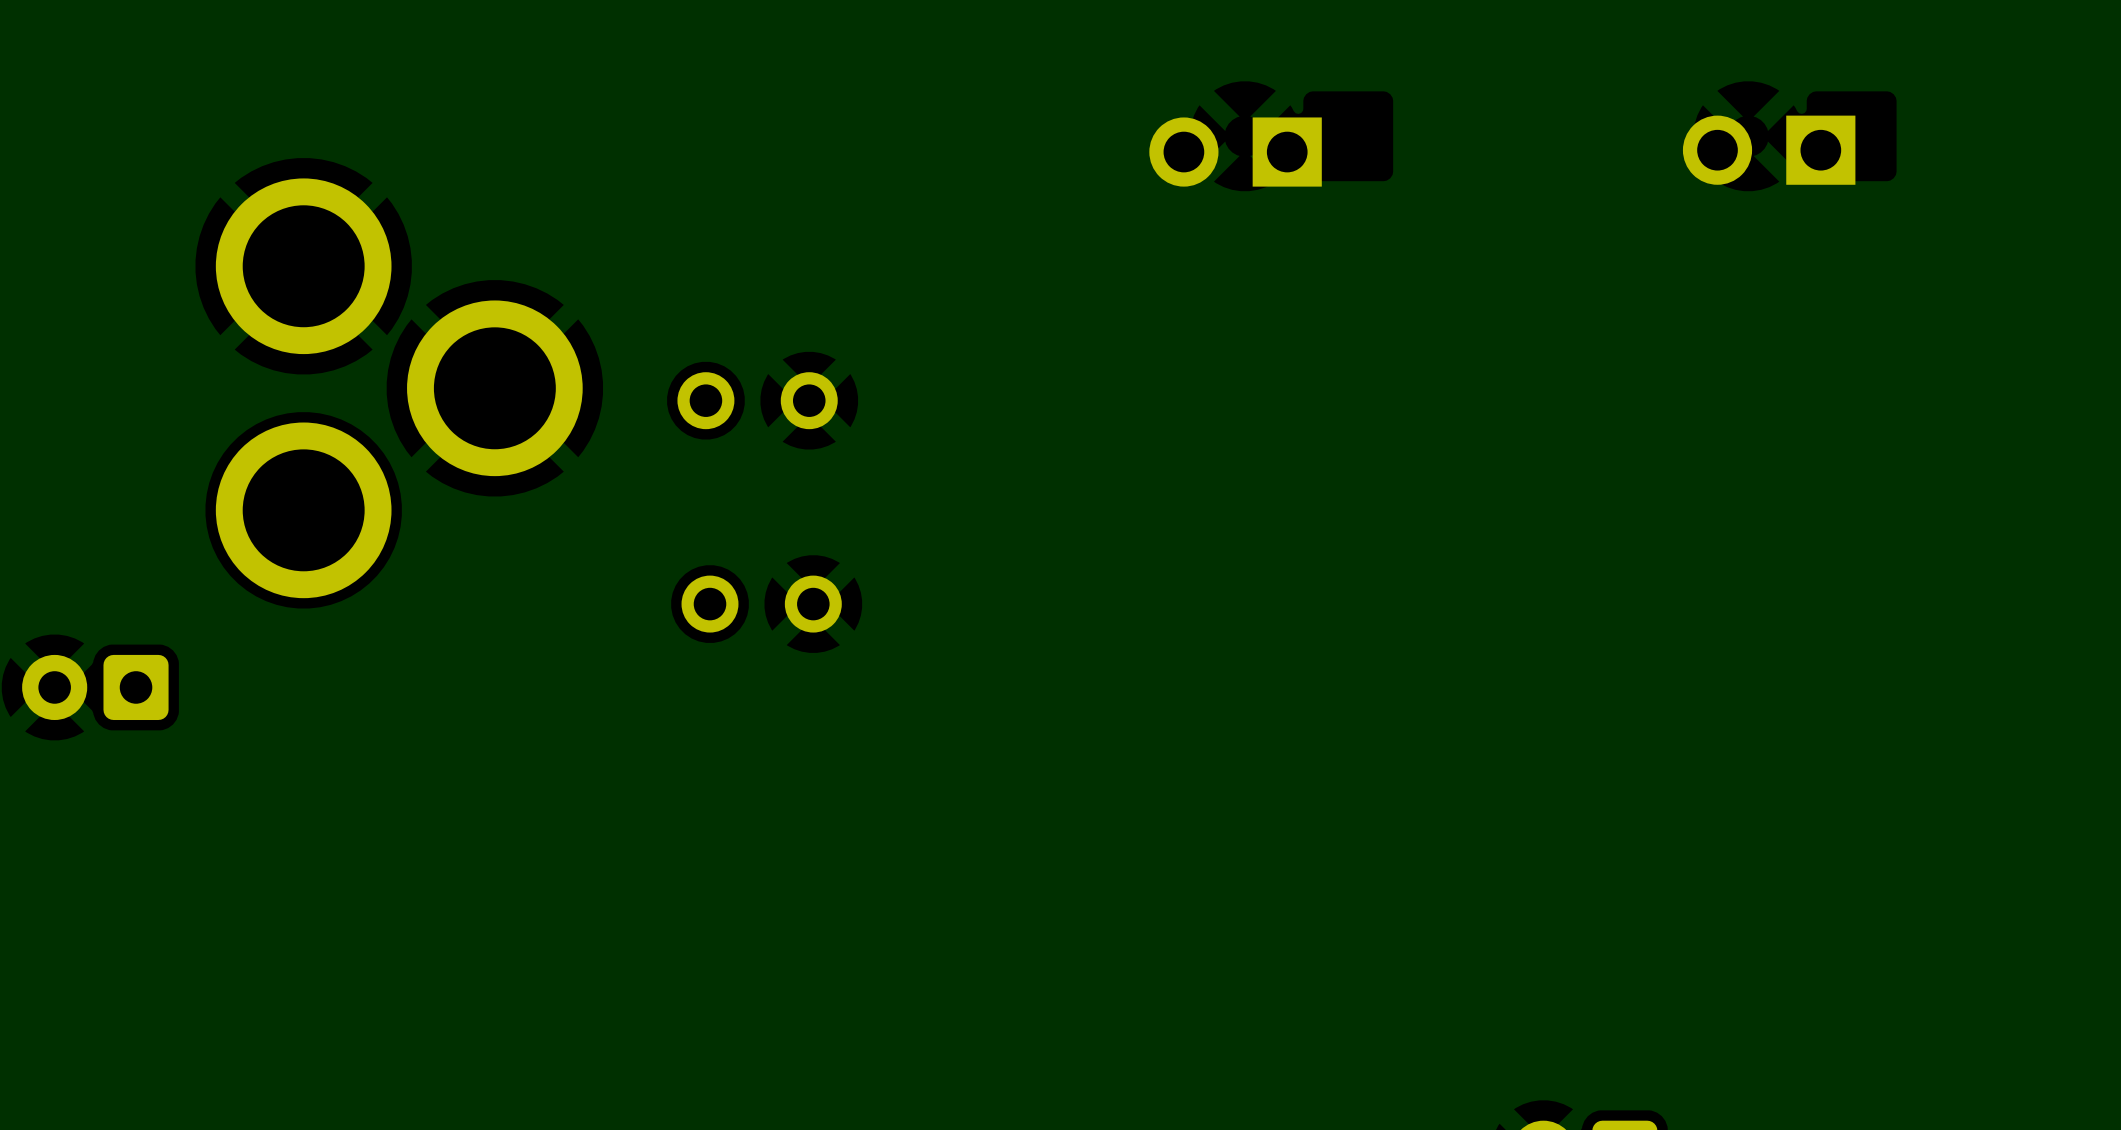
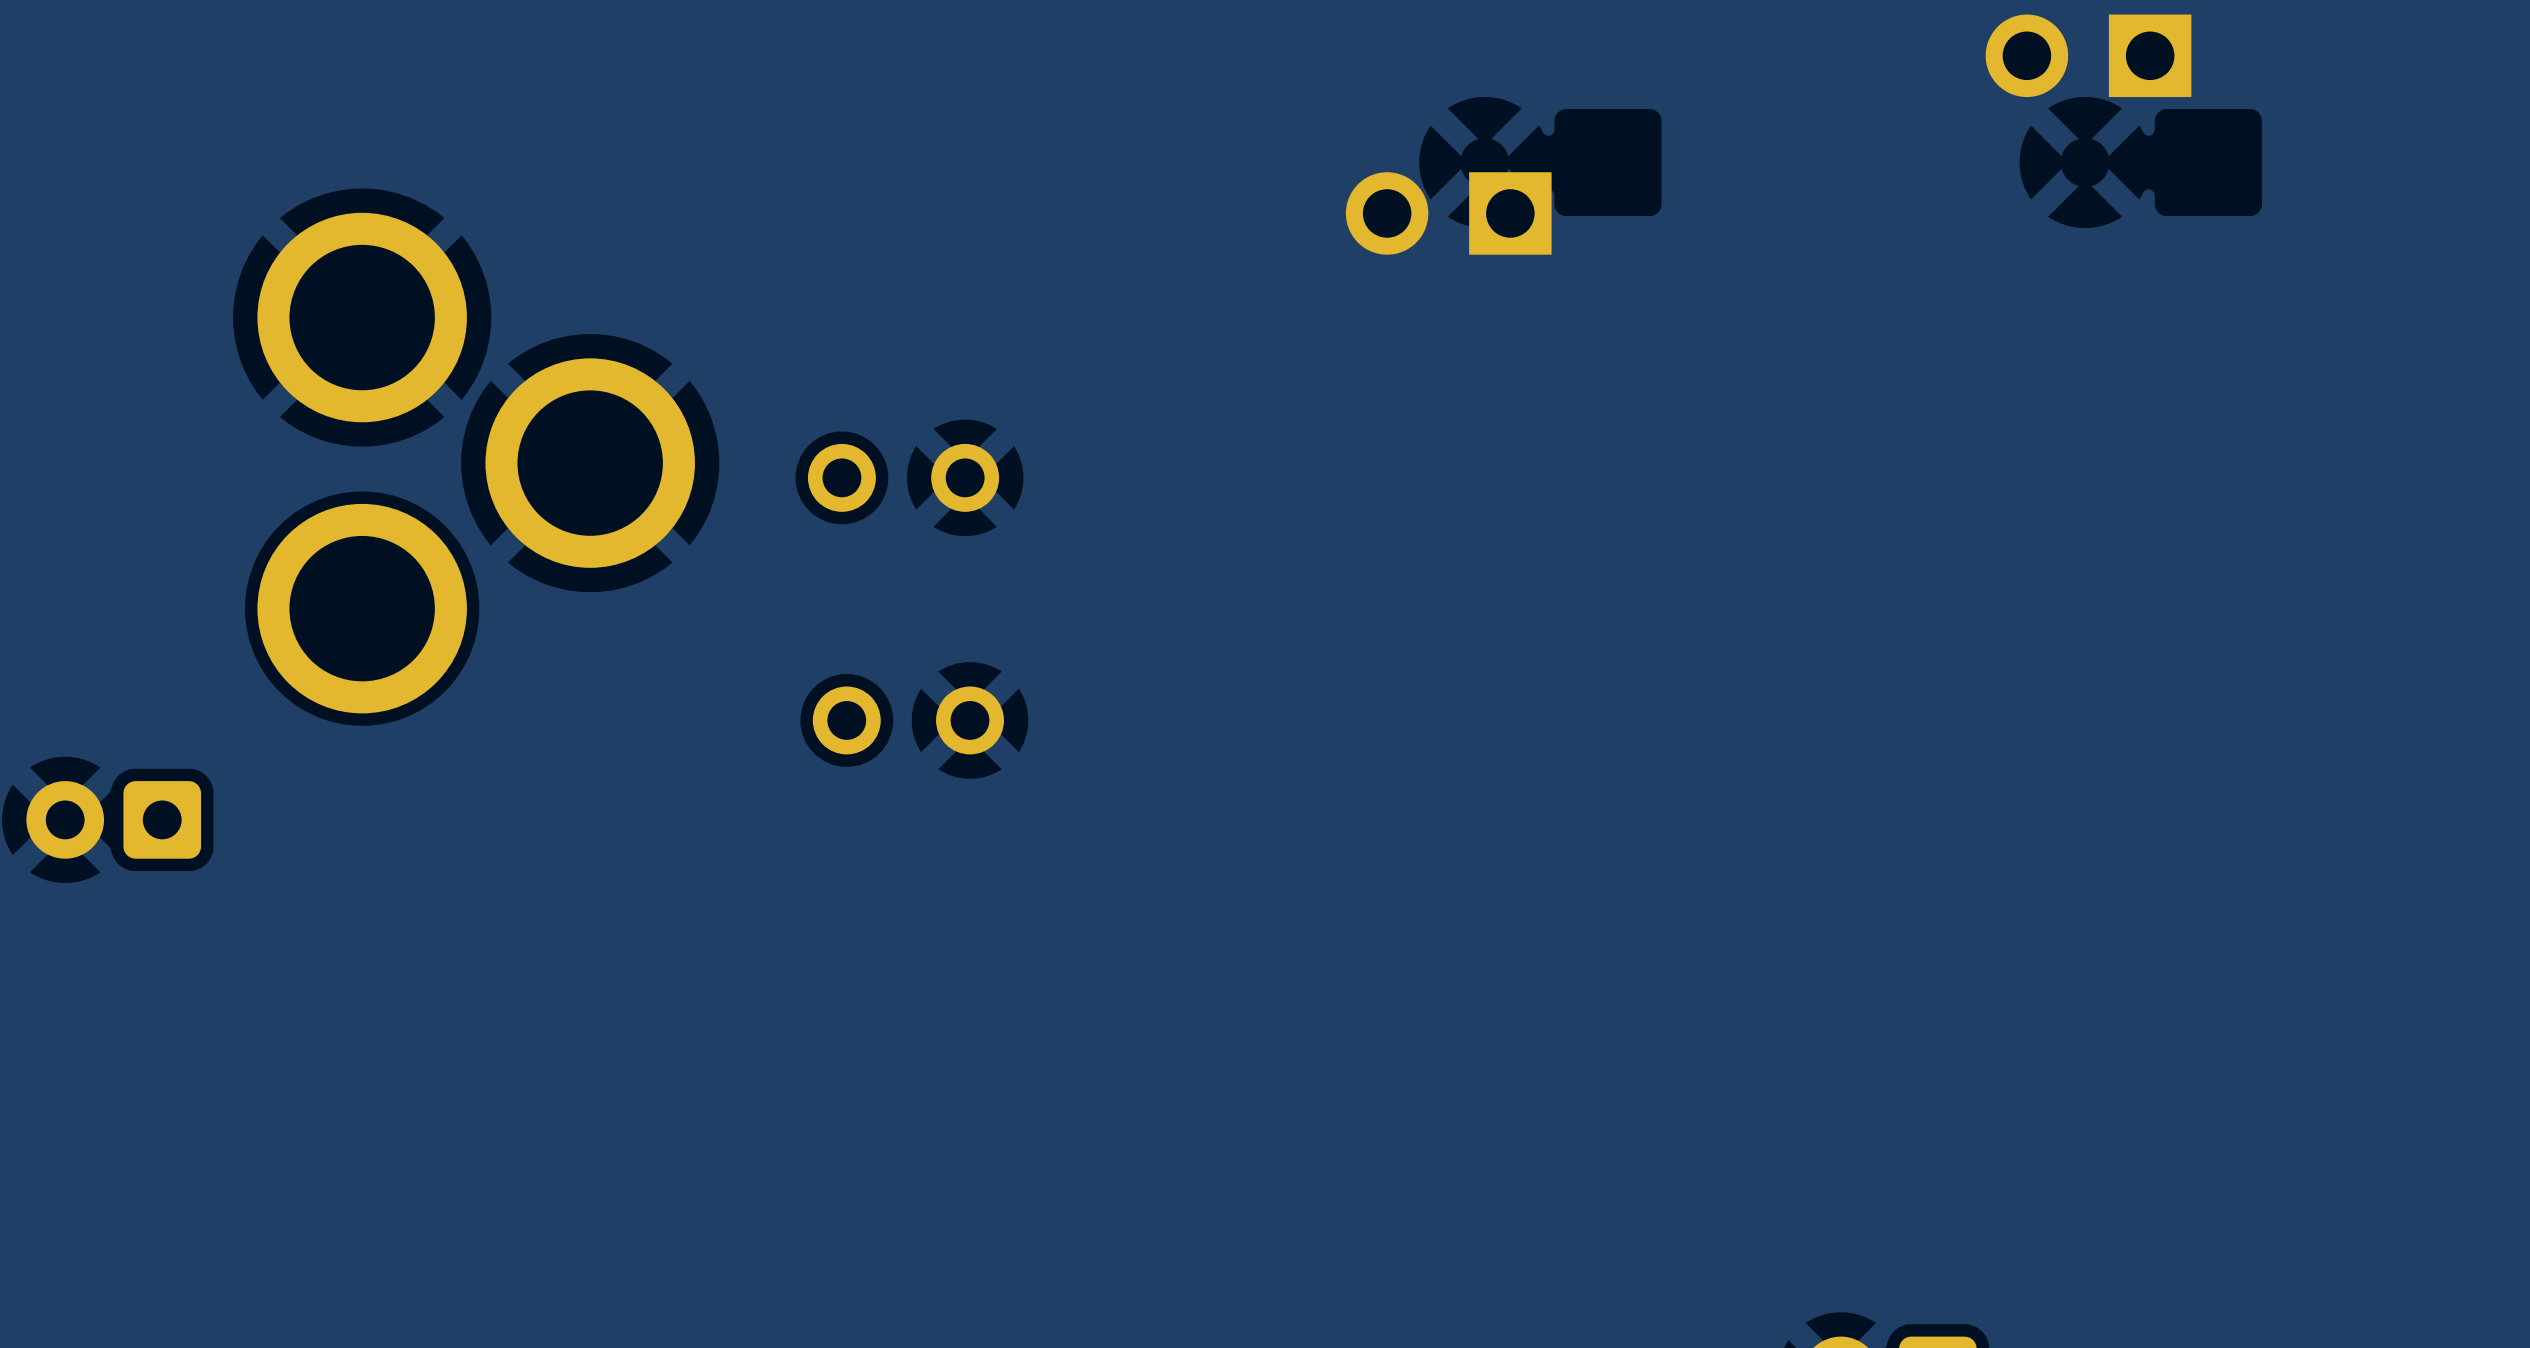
part position: (1769, 150) -> (2088, 55)
part position: (1235, 152) -> (1448, 213)

